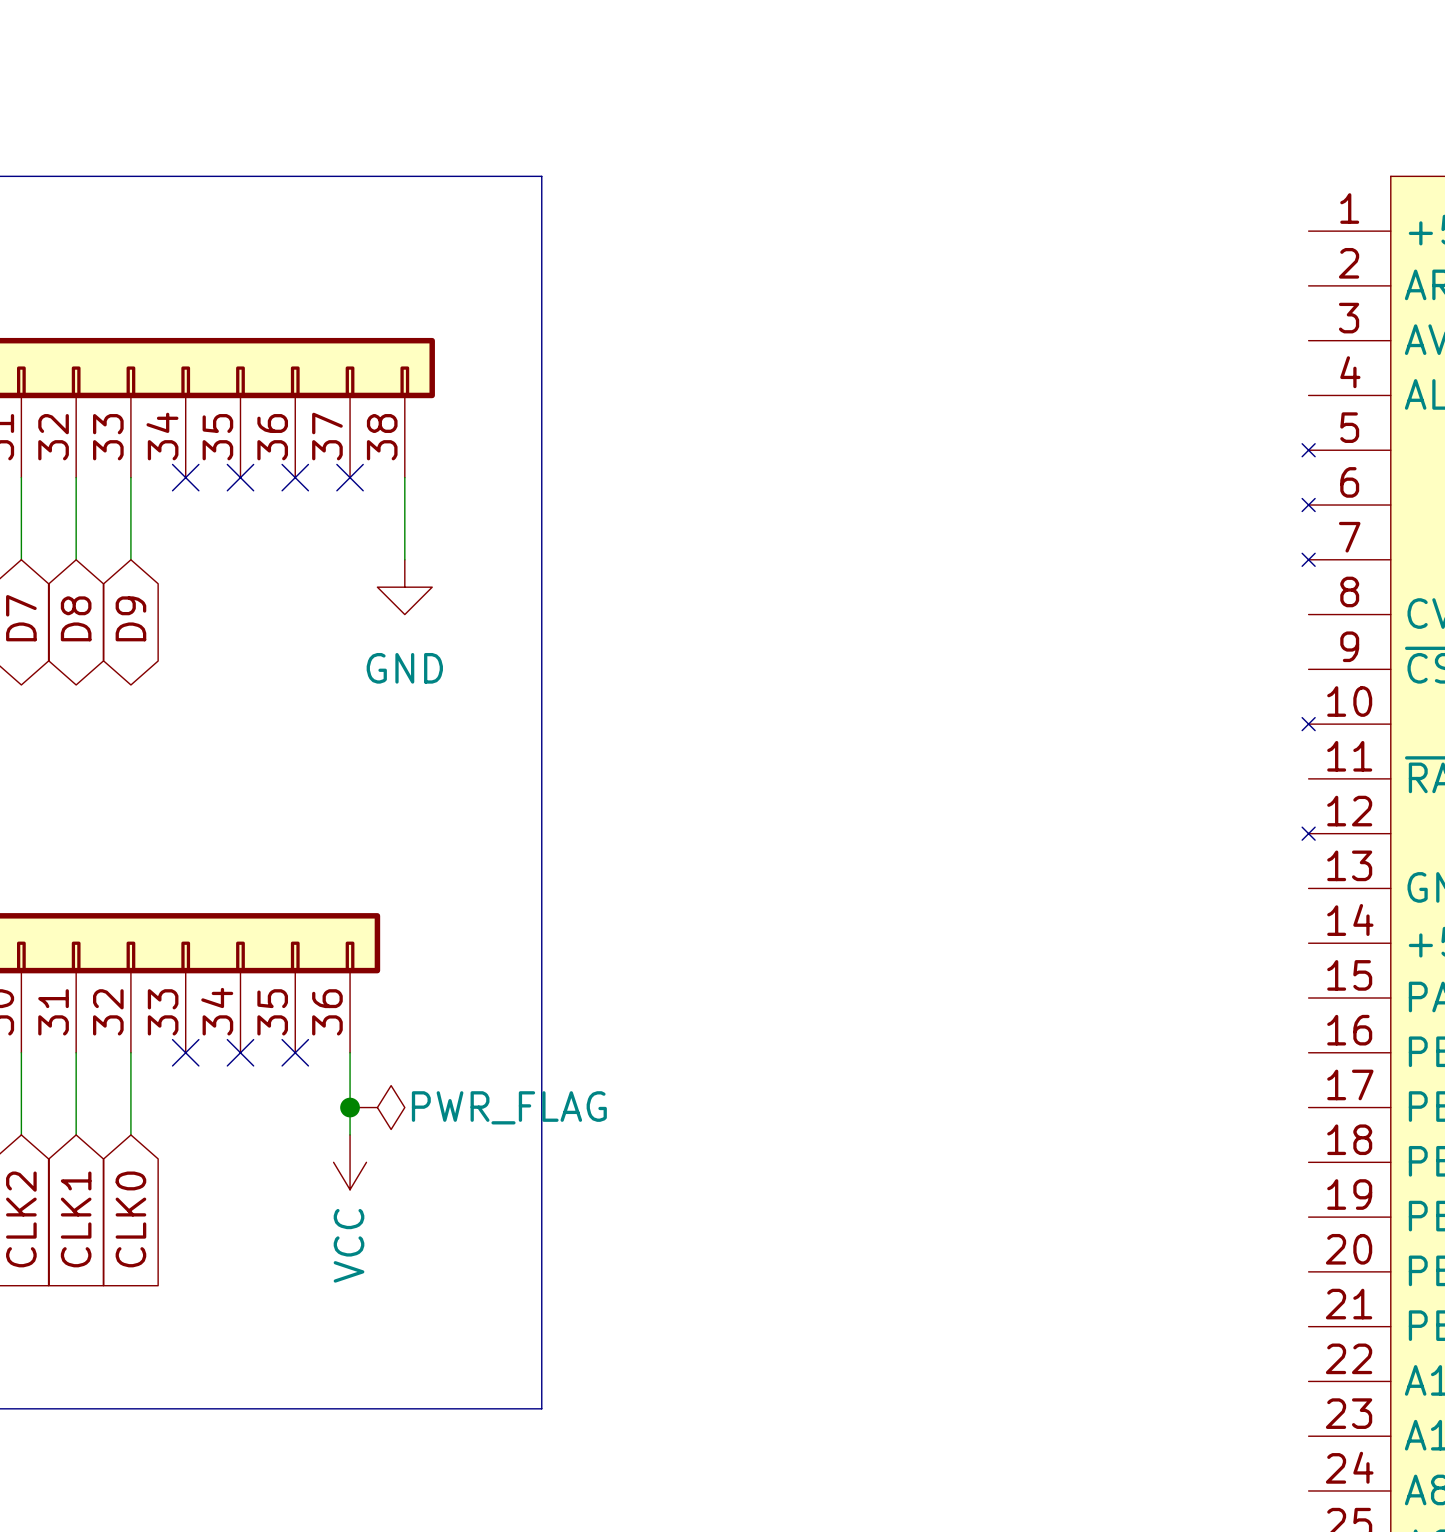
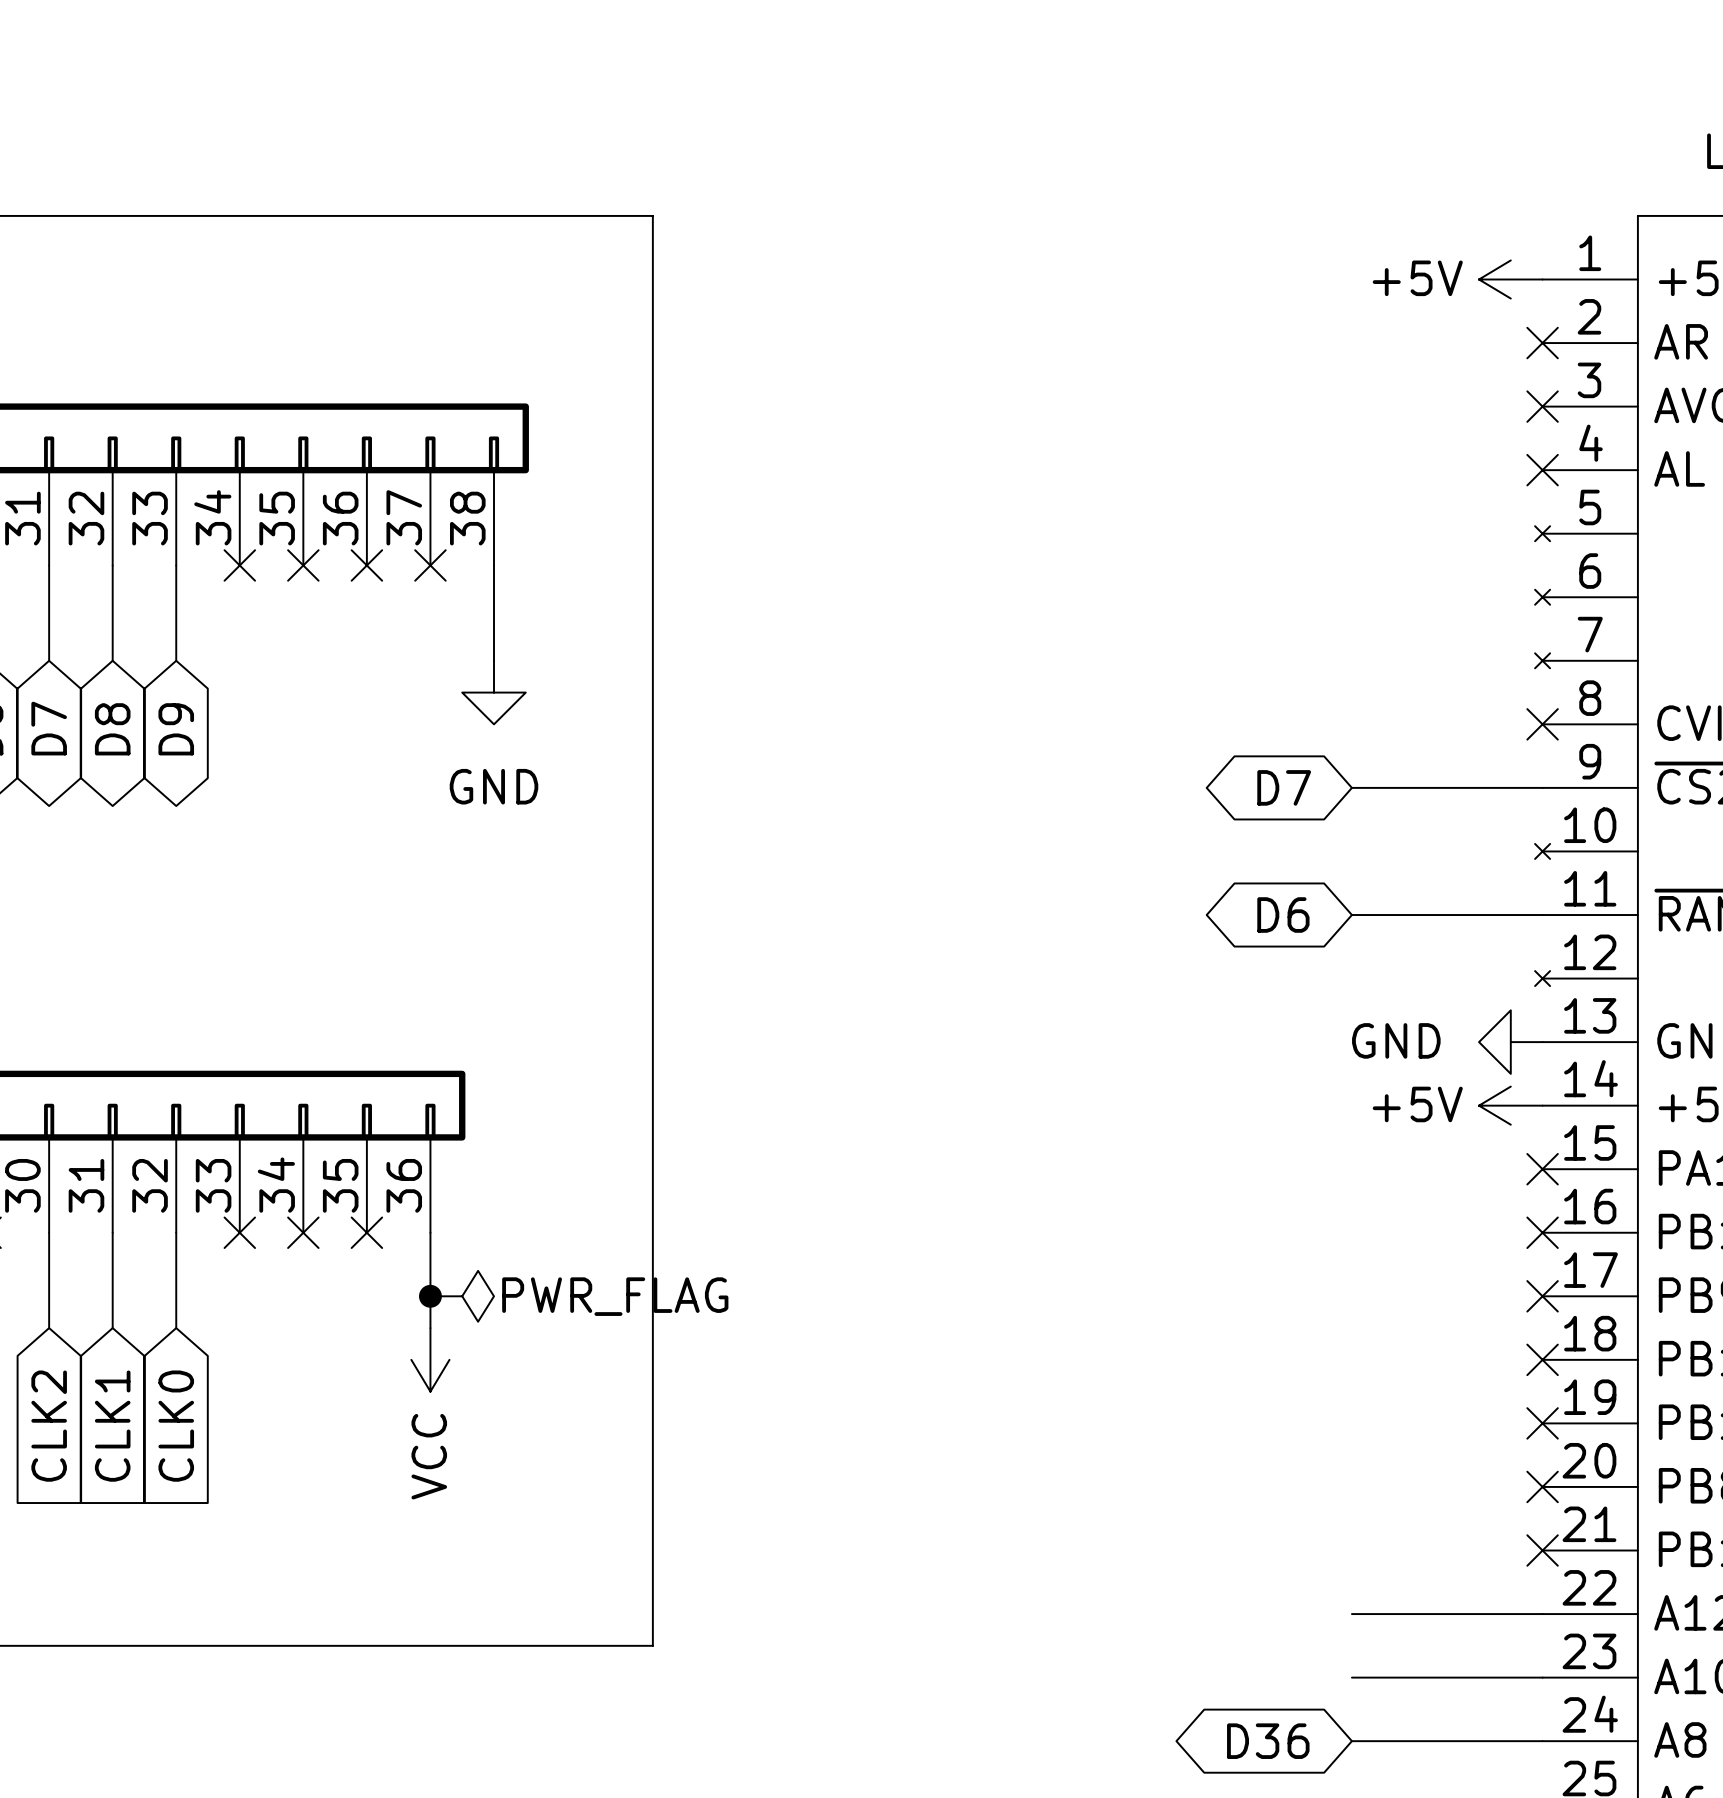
power symbol: none -> +5V (1510, 279)
no-connect mark: none -> (1542, 343)
no-connect mark: none -> (1542, 406)
no-connect mark: none -> (1542, 470)
no-connect mark: none -> (1542, 724)
global label: none -> D7 (1284, 787)
wire: none -> (1351, 787) (1542, 787)
global label: none -> D6 (1283, 915)
wire: none -> (1351, 915) (1542, 915)
power symbol: none -> GND (1510, 1042)
power symbol: none -> +5V (1510, 1105)
no-connect mark: none -> (1542, 1169)
no-connect mark: none -> (1542, 1232)
no-connect mark: none -> (1542, 1296)
no-connect mark: none -> (1542, 1359)
no-connect mark: none -> (1542, 1423)
no-connect mark: none -> (1542, 1486)
no-connect mark: none -> (1542, 1550)
wire: none -> (1351, 1614) (1542, 1614)
wire: none -> (1351, 1677) (1542, 1677)
global label: none -> D36 (1268, 1741)
wire: none -> (1351, 1741) (1542, 1741)

